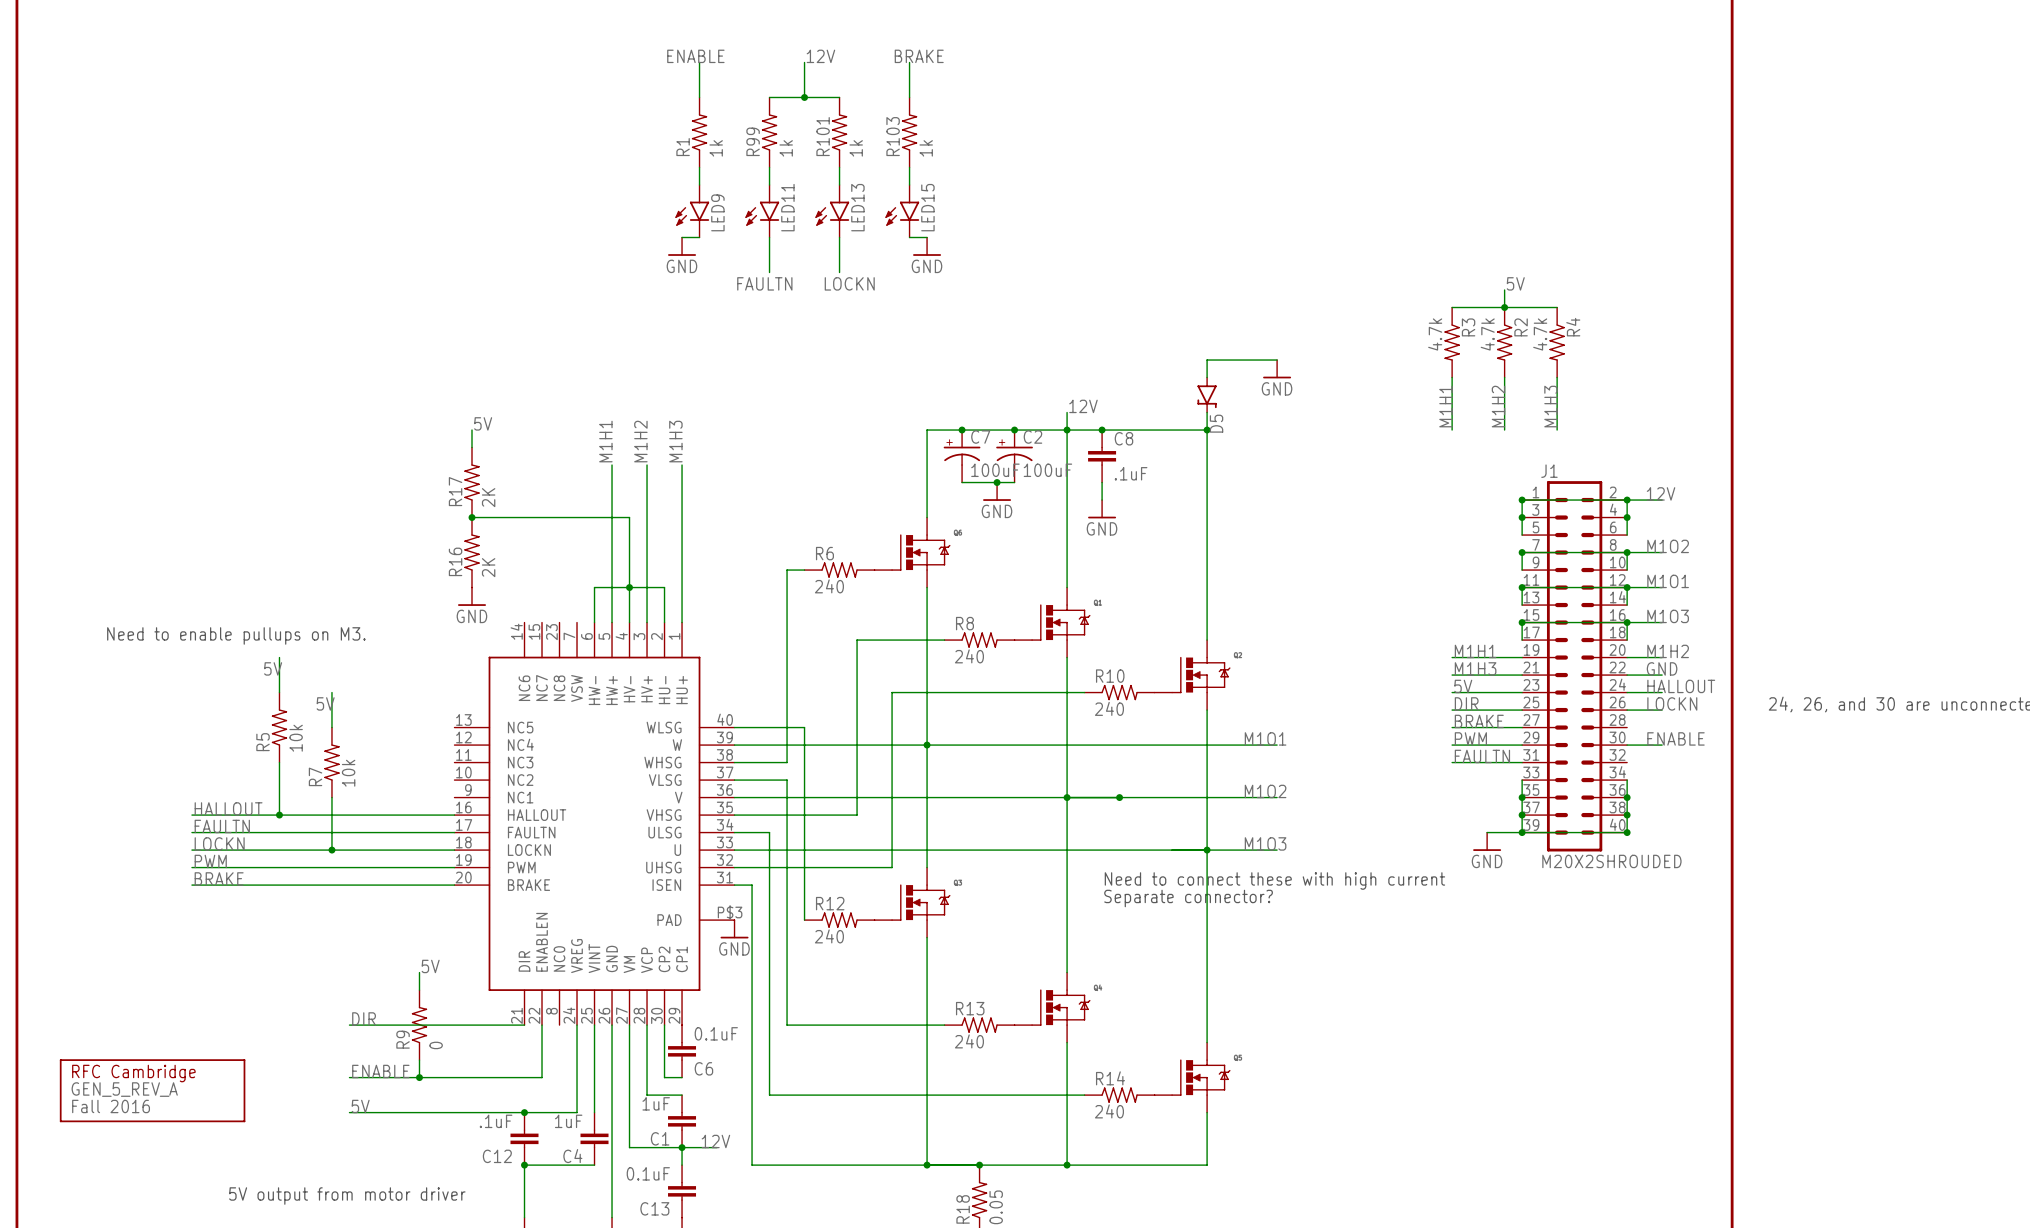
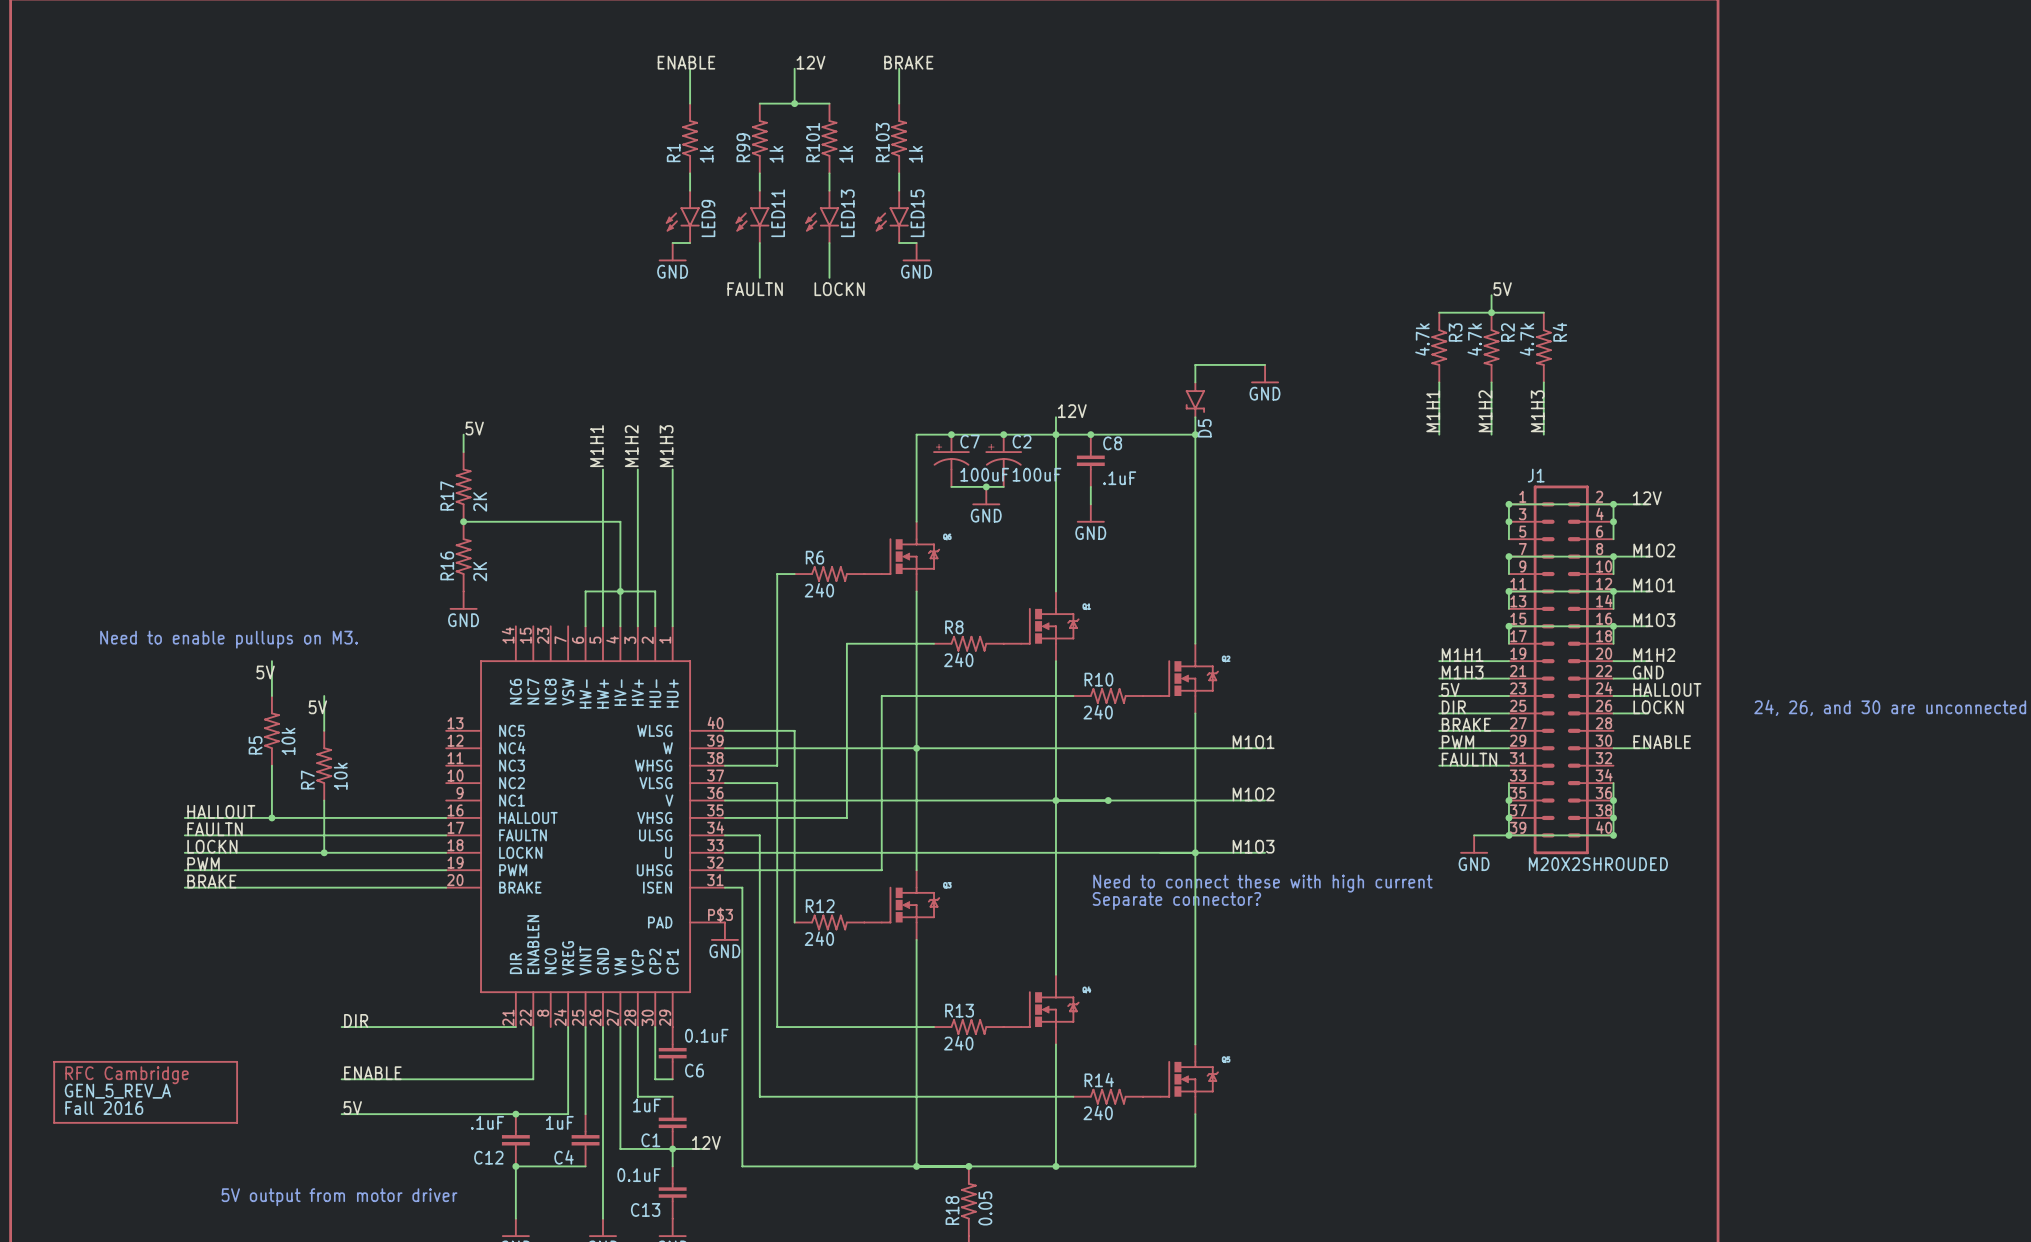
label: 5V (430, 966) -> none
wire: (419, 972) (419, 990) -> none
R9: 0 (419, 1025) -> none
wire: (419, 1060) (419, 1077) -> none
junction: (419, 1077) -> none

